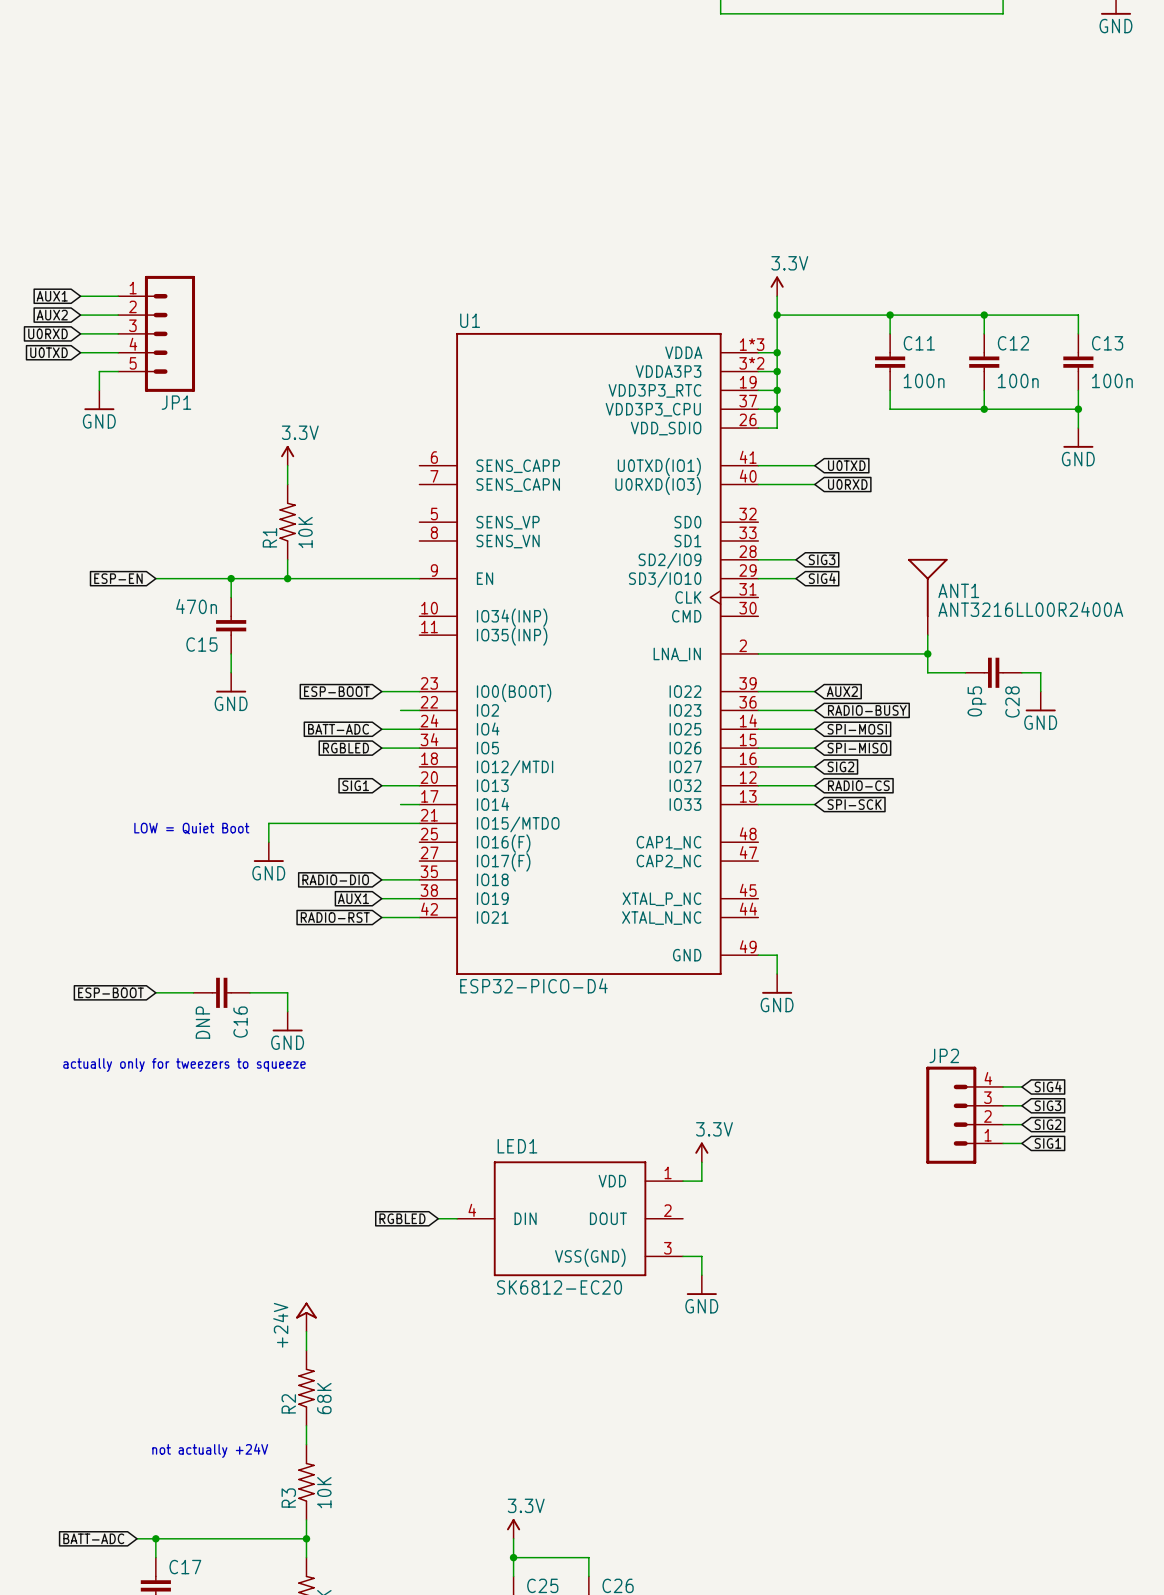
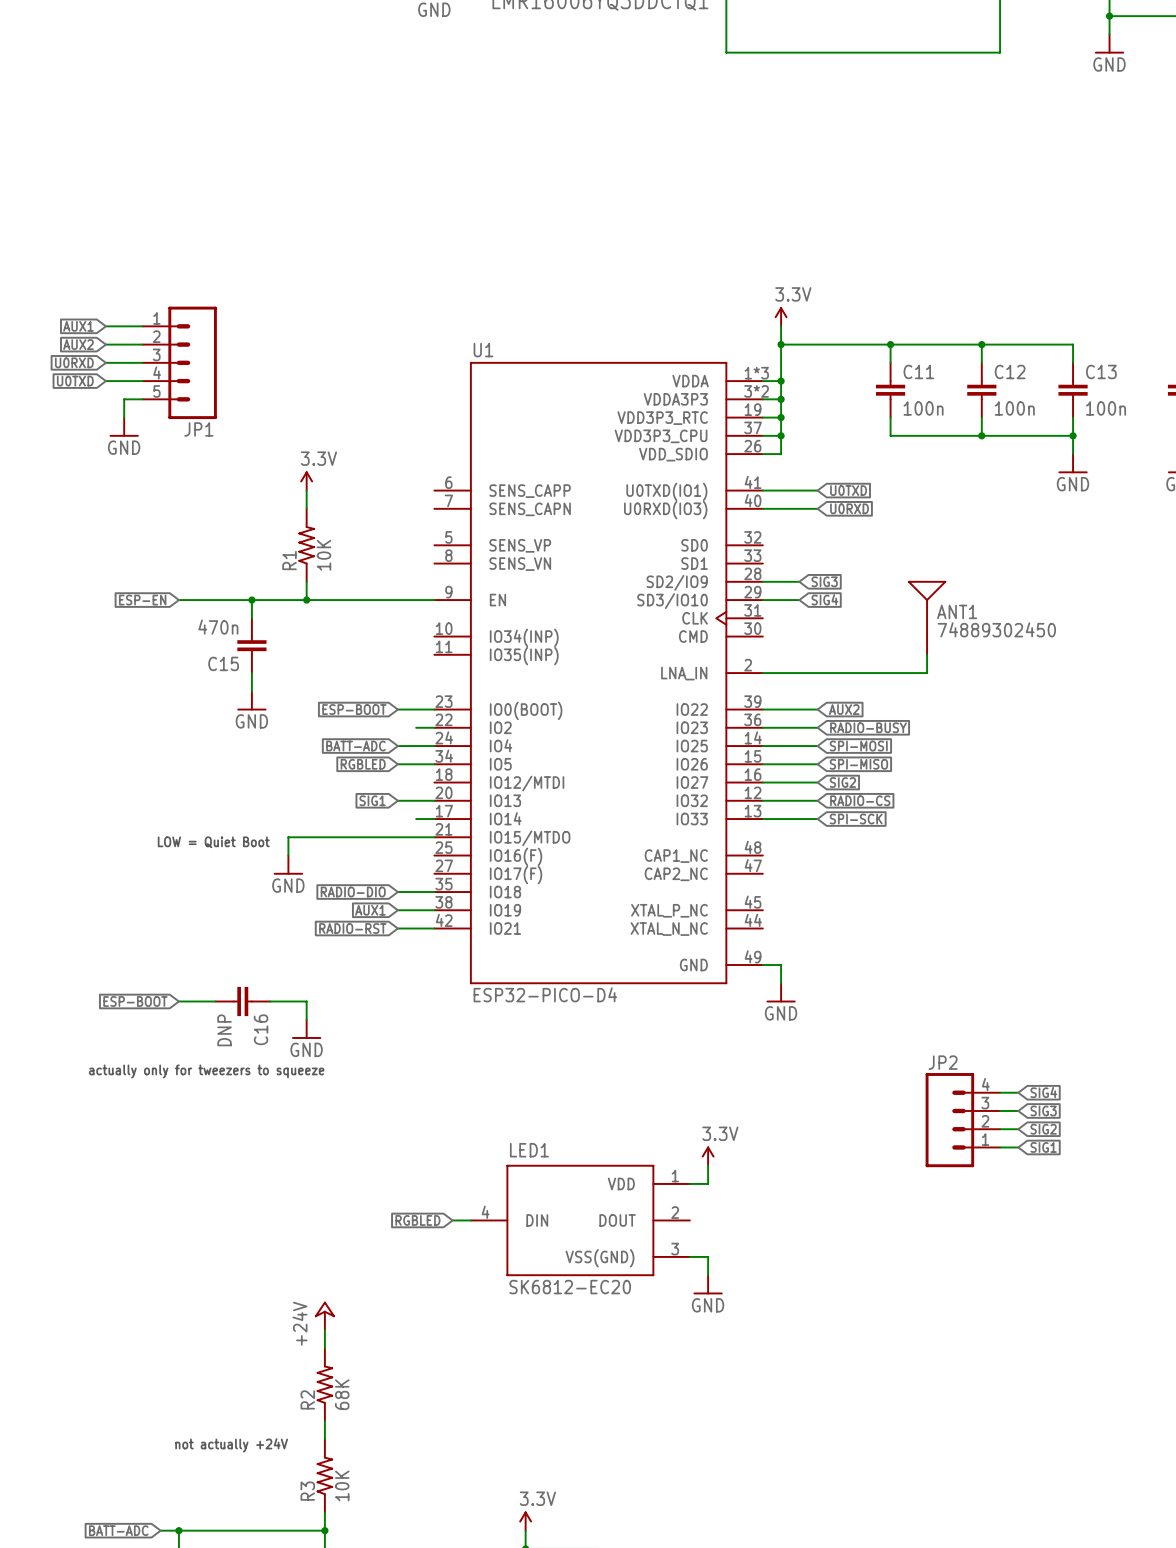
ANT1 value: ANT3216LL00R2400A (1030, 609) -> 74889302450 (996, 629)
wire: (927, 653) (927, 672) (965, 672) -> none
junction: (927, 653) -> none
C28: 0p5 (993, 672) -> none
wire: (1021, 672) (1040, 672) (1040, 691) -> none
power symbol: GND (1040, 701) -> none

